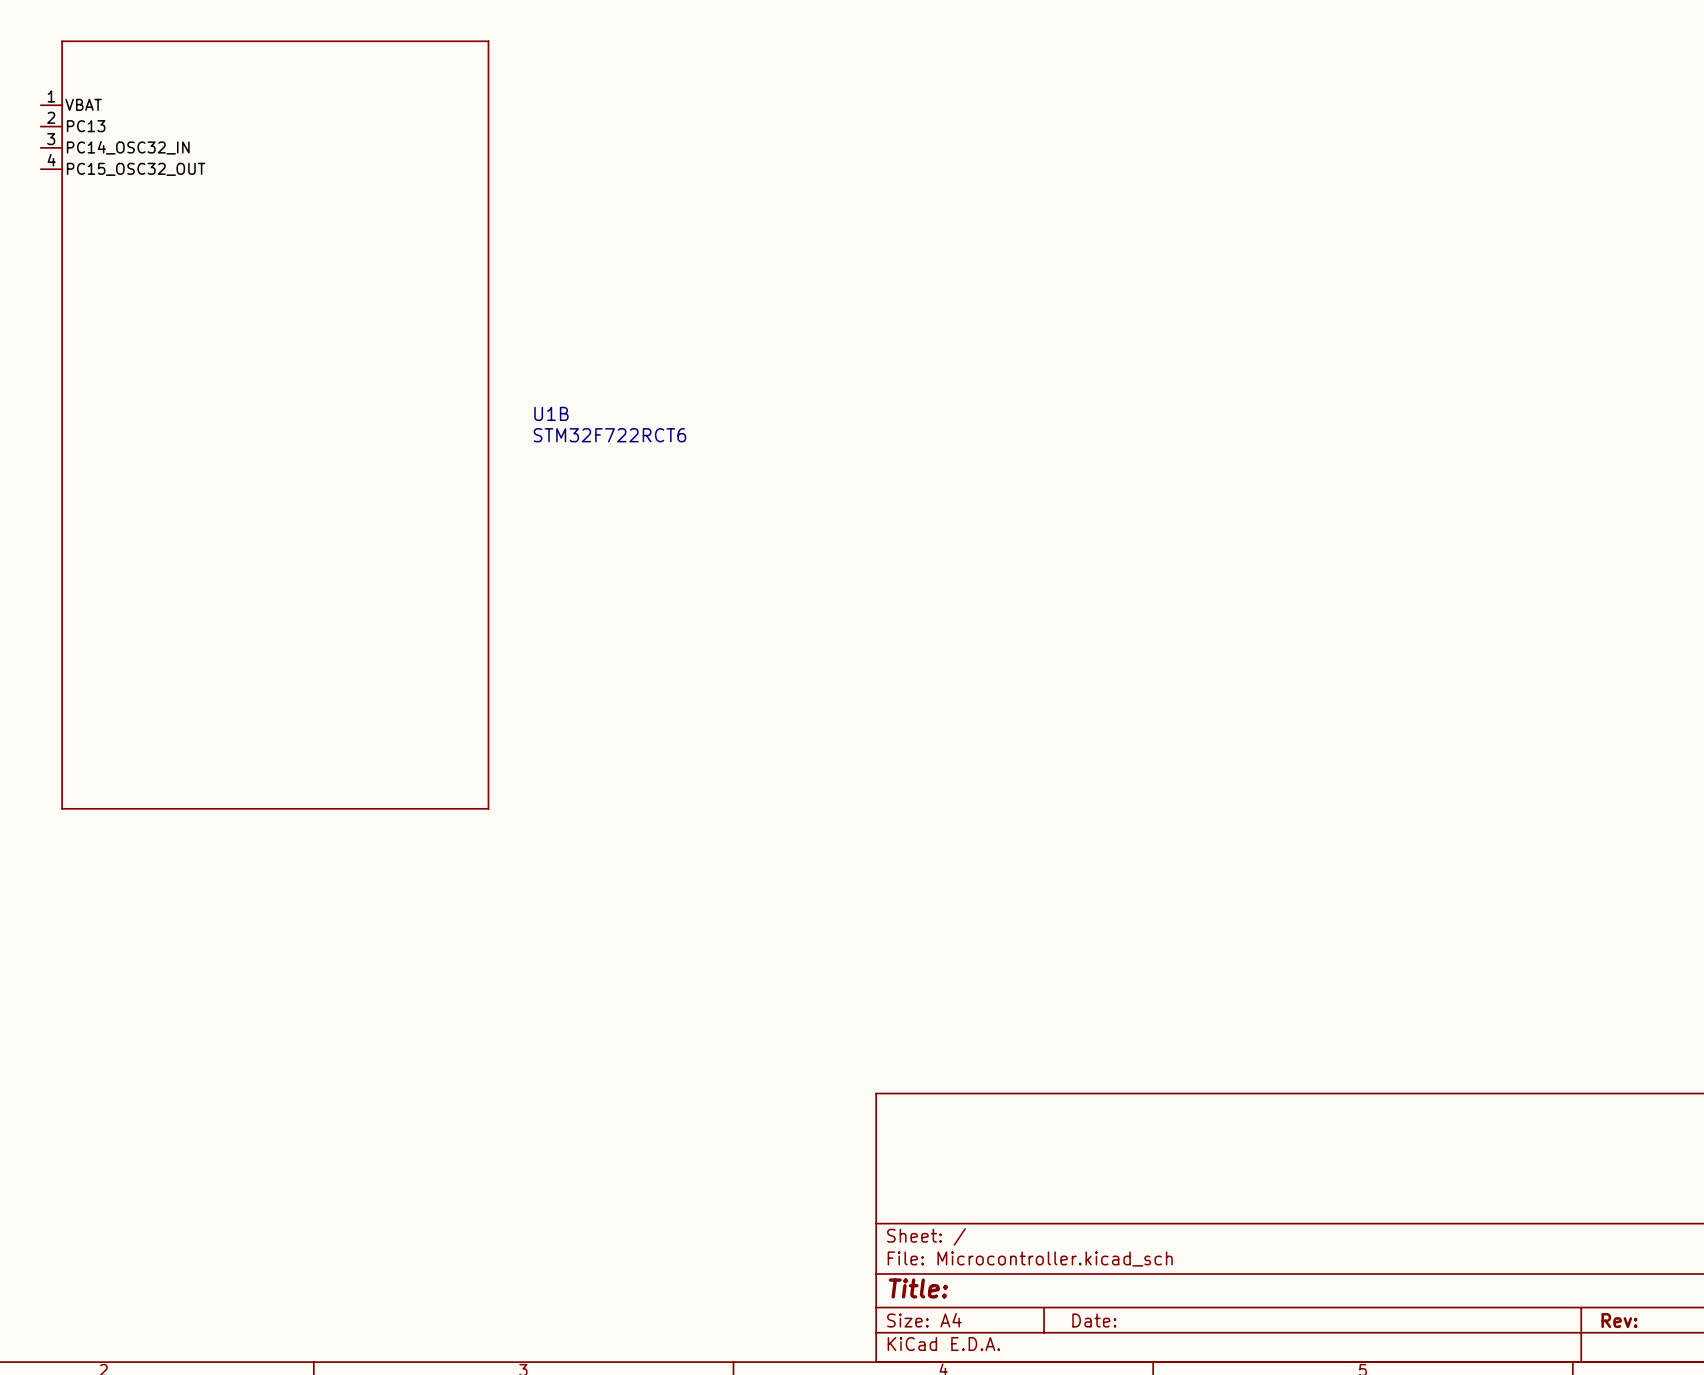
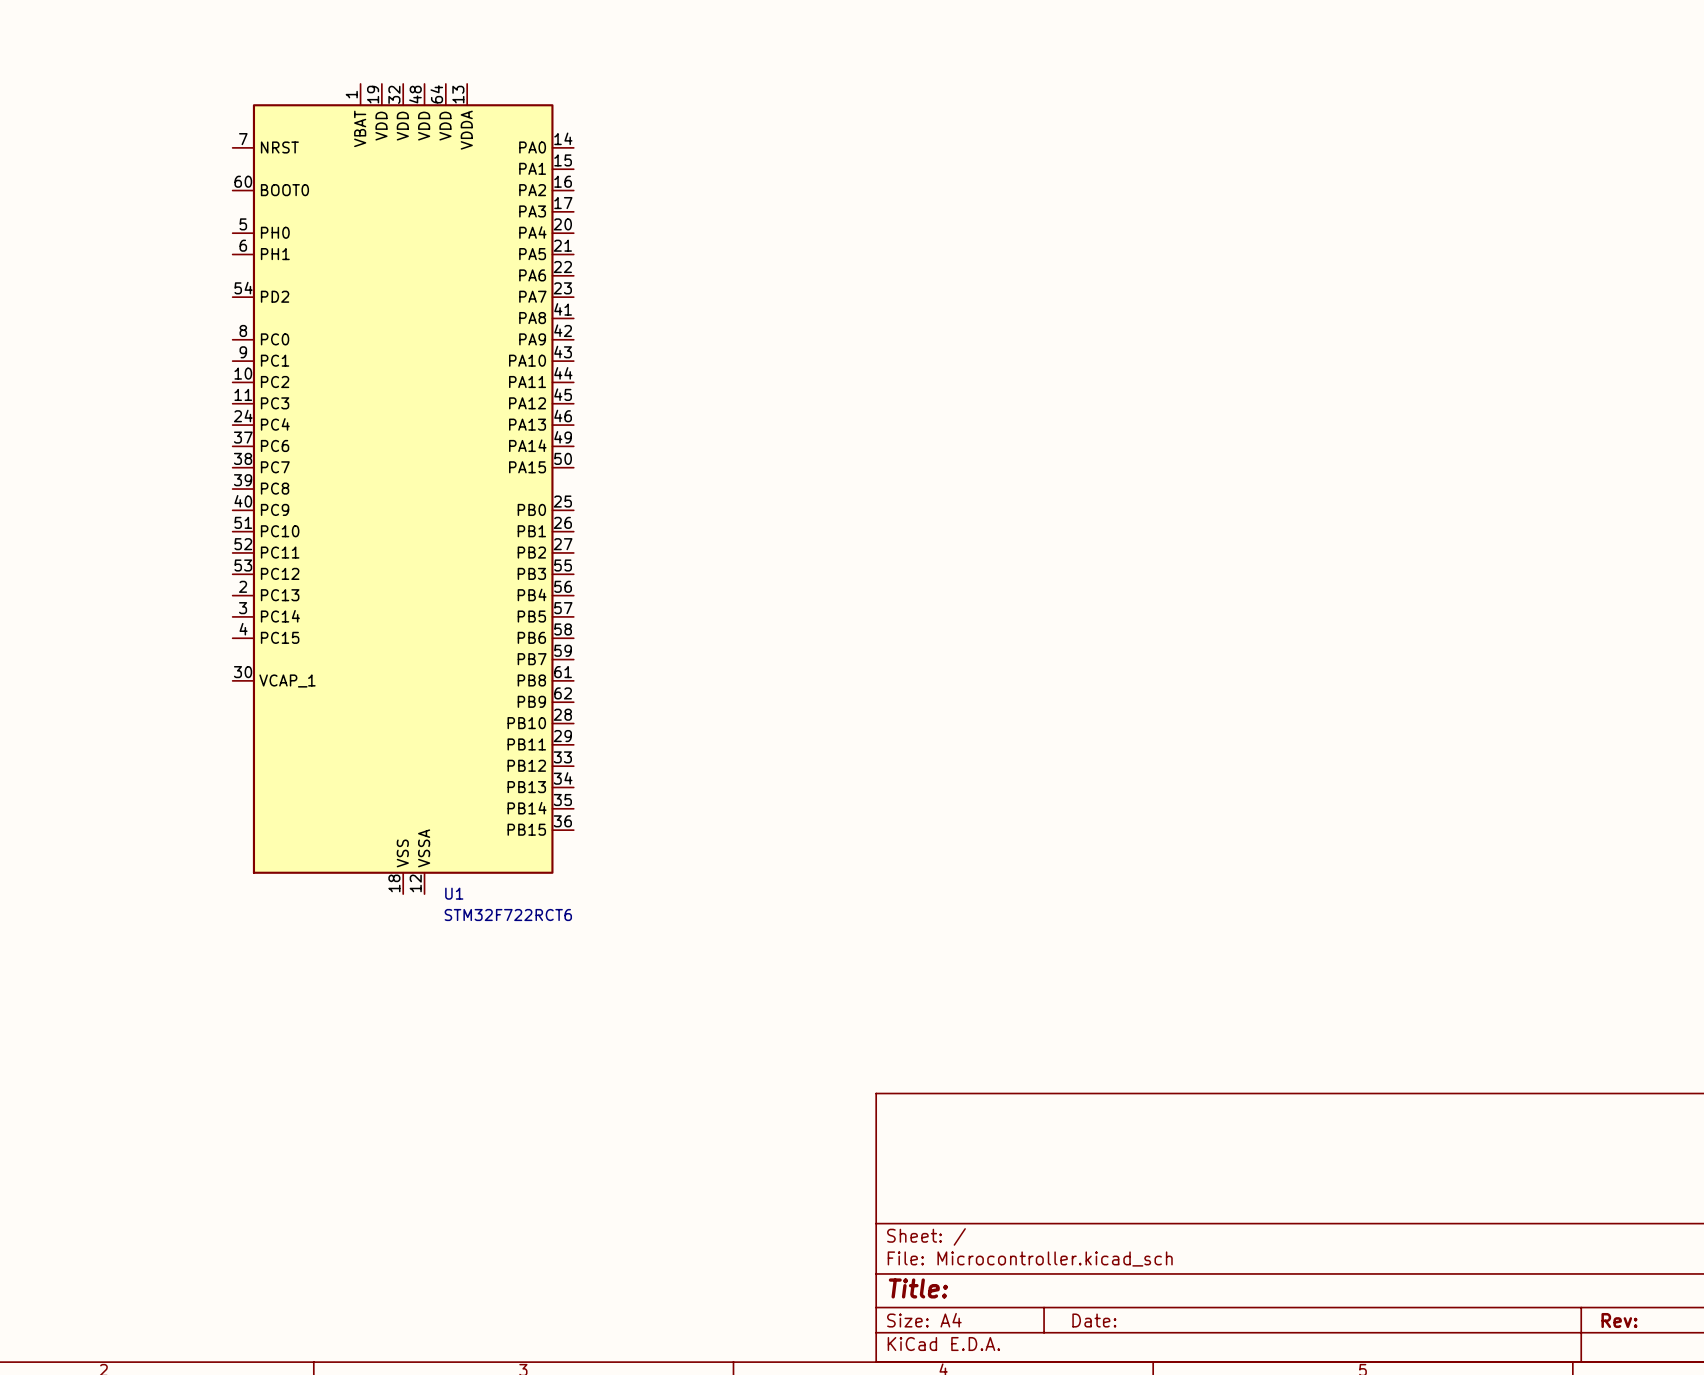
U1B: STM32F722RCT6 (264, 425) -> none
U1: none -> STM32F722RCT6 (403, 489)

